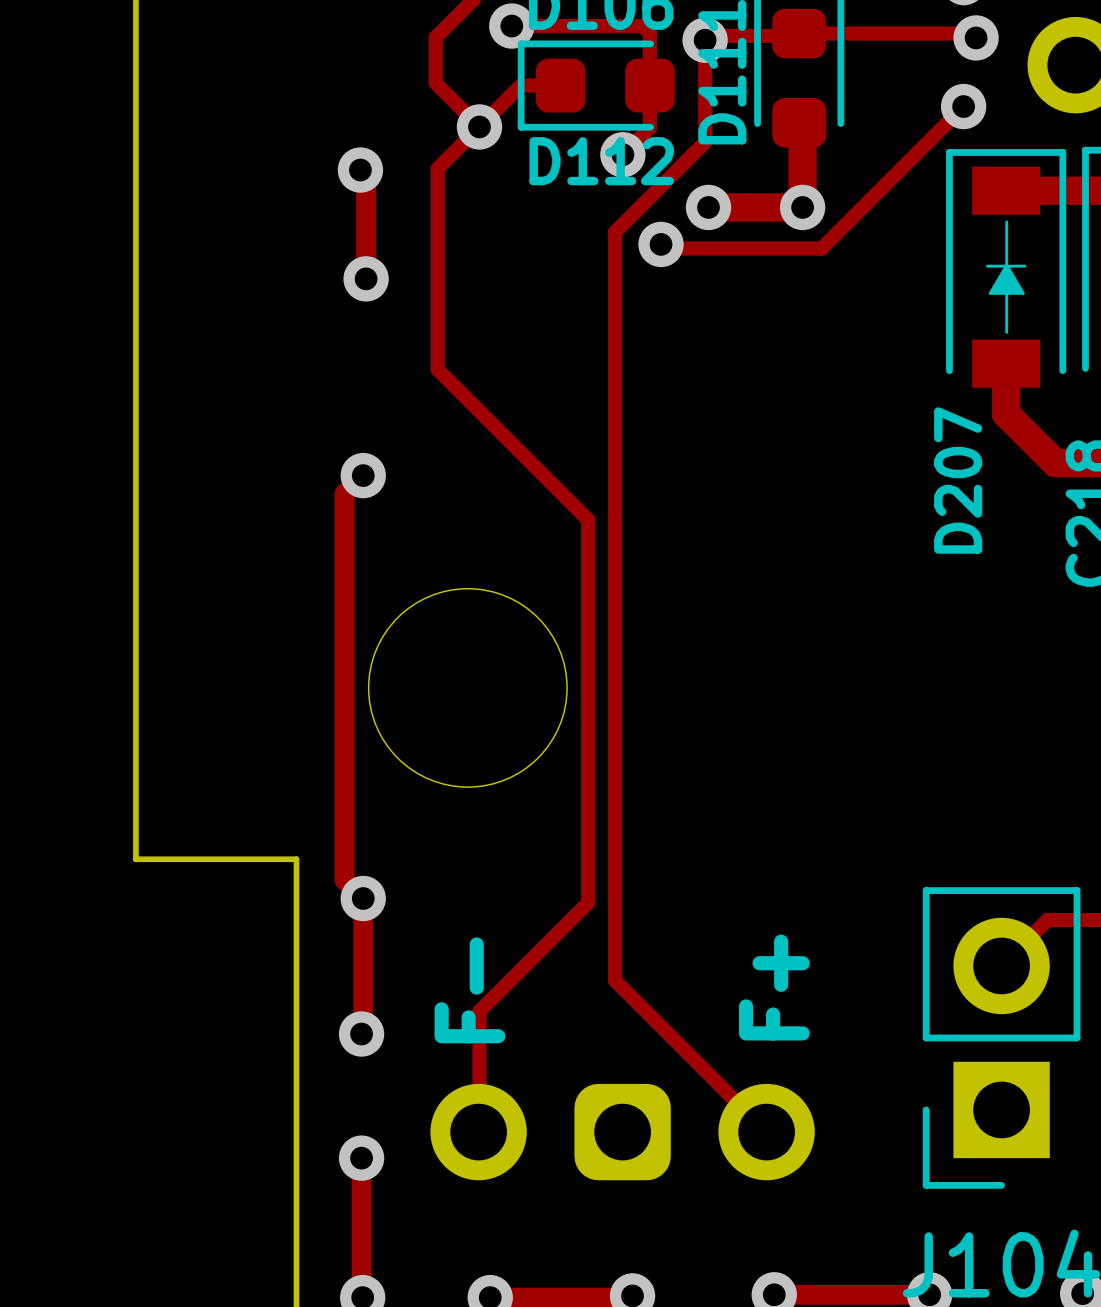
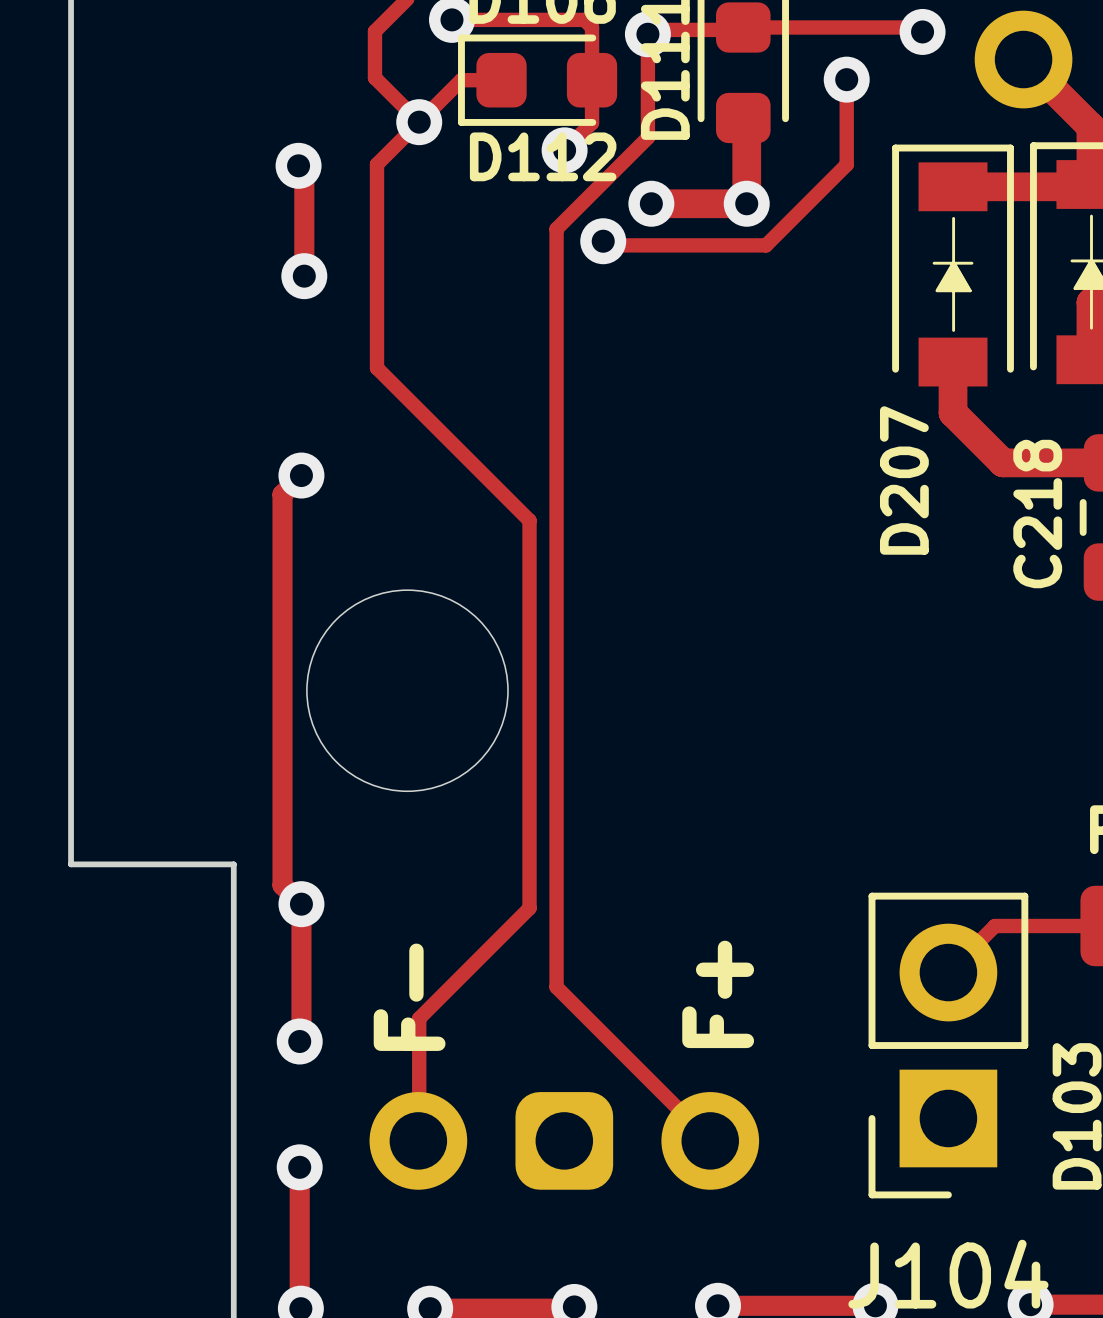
track: (963, 106) (901, 168) -> (846, 79) (846, 164)
via position: (963, 106) -> (846, 79)

